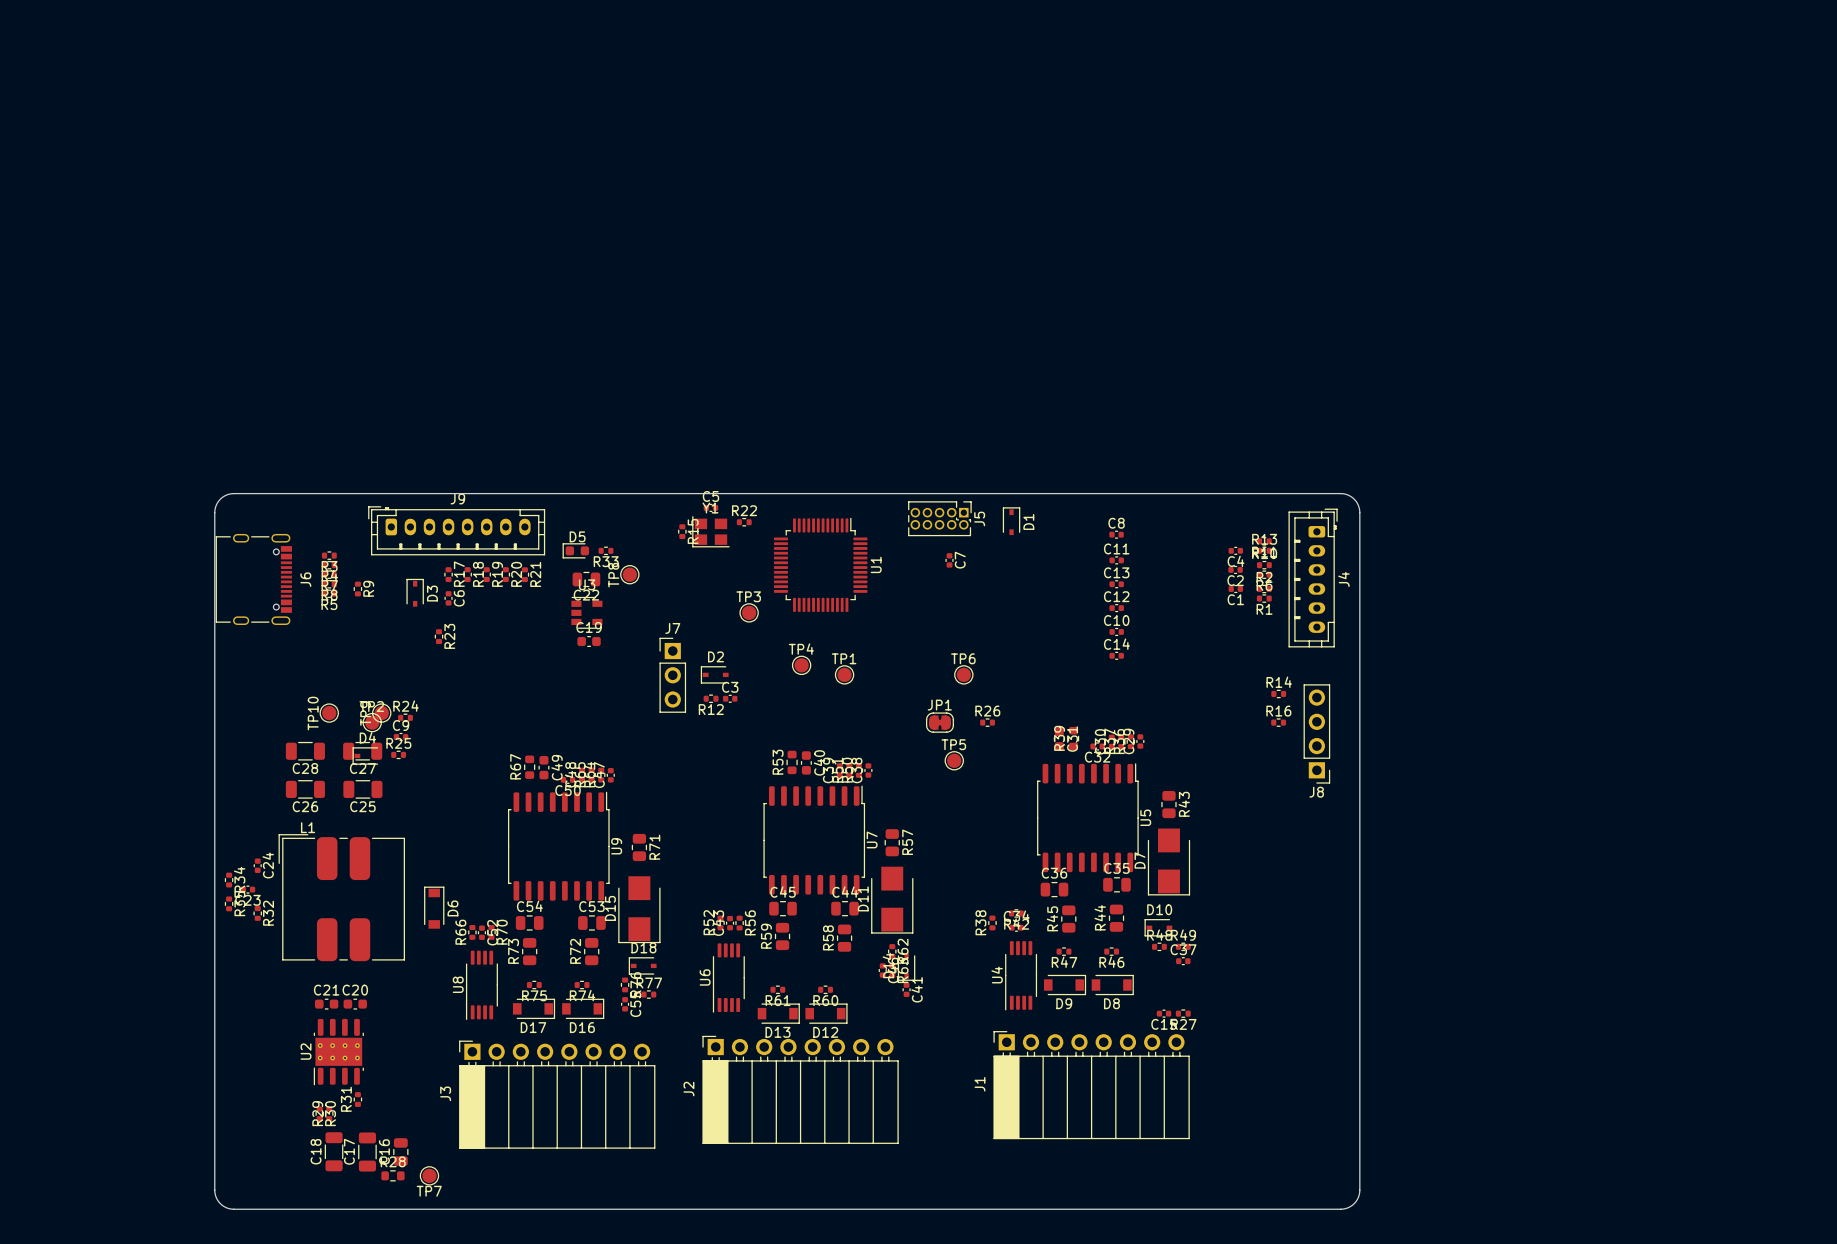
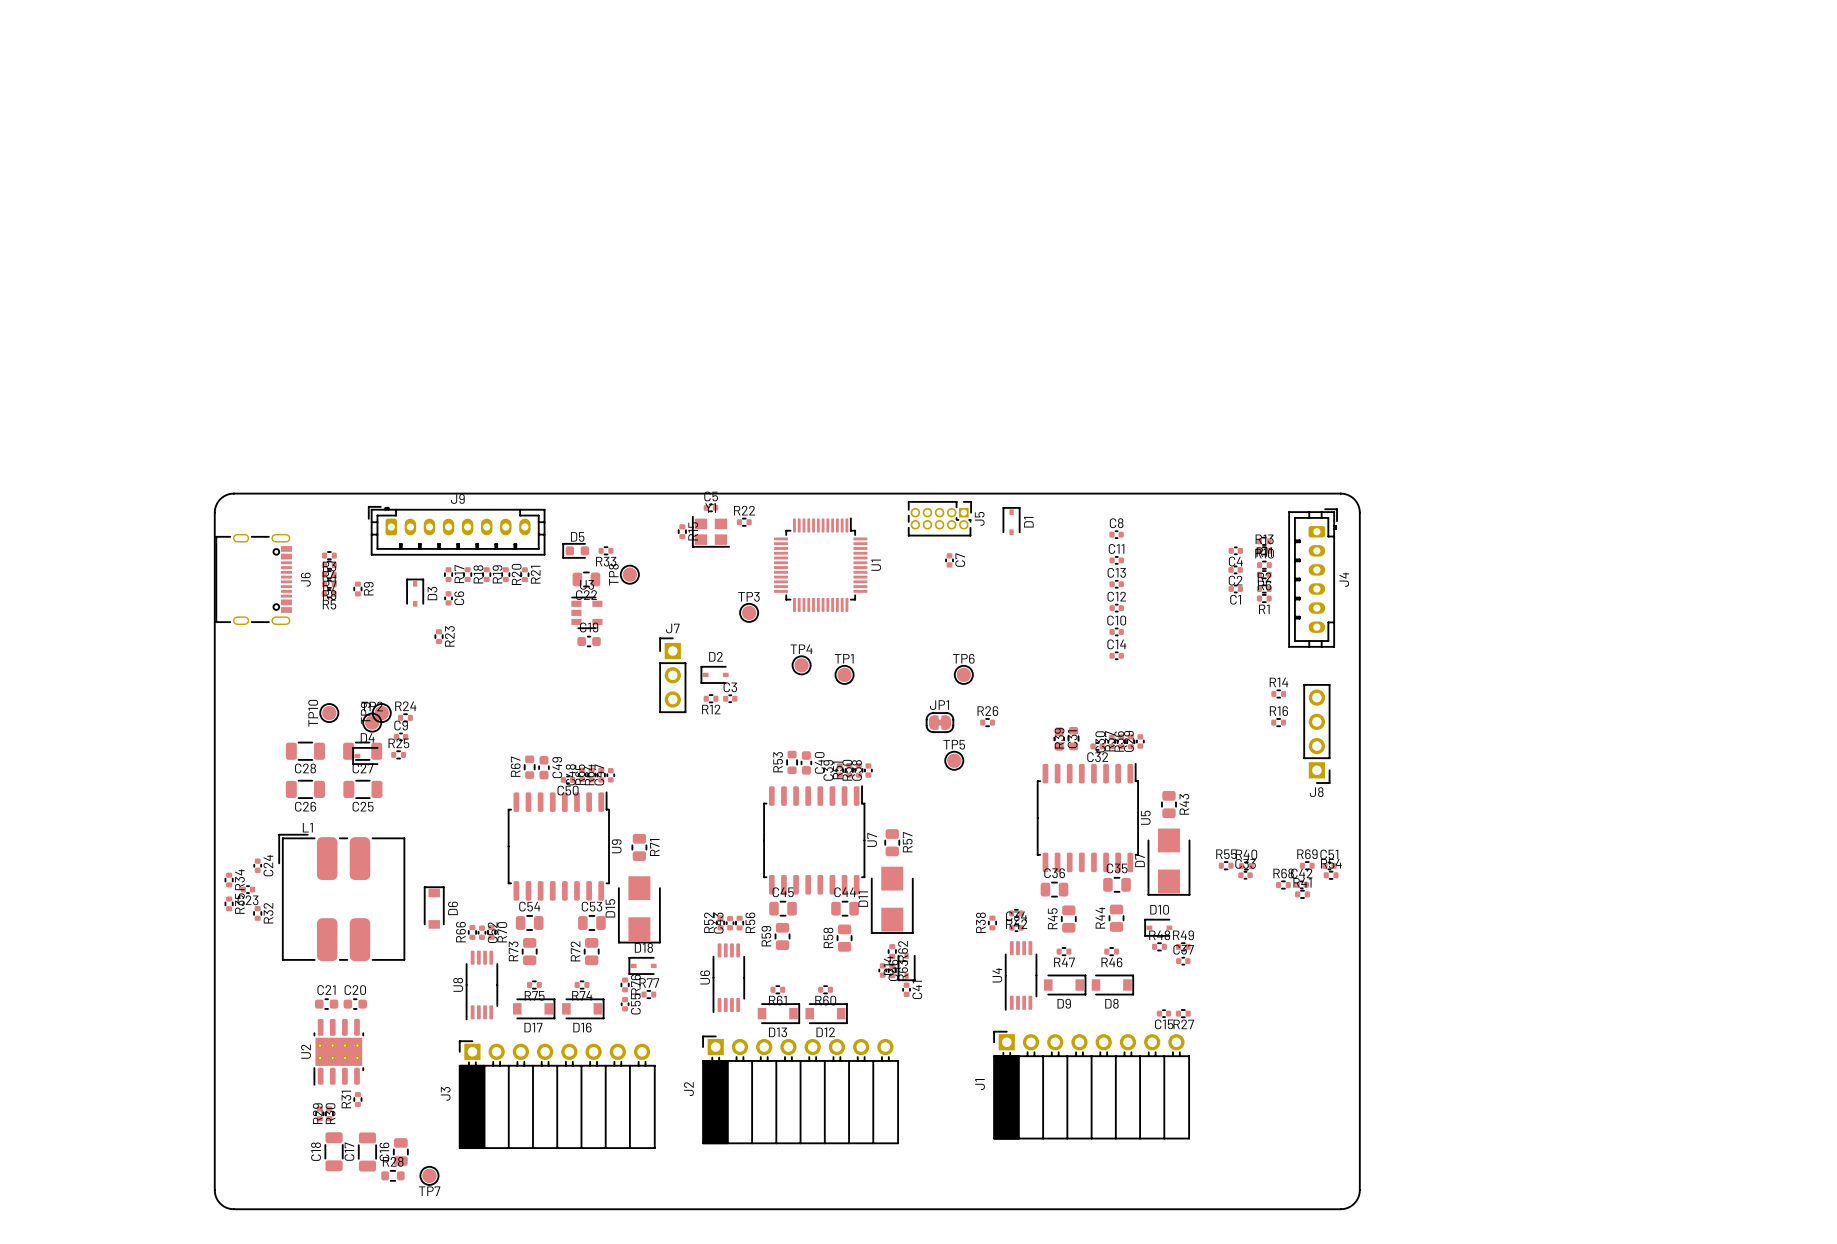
R55: none -> (1226, 865)
R69: none -> (1307, 865)
C51: none -> (1329, 865)
R40: none -> (1246, 866)
C33: none -> (1245, 875)
R54: none -> (1331, 875)
C42: none -> (1301, 884)
R68: none -> (1283, 885)
R41: none -> (1302, 894)

